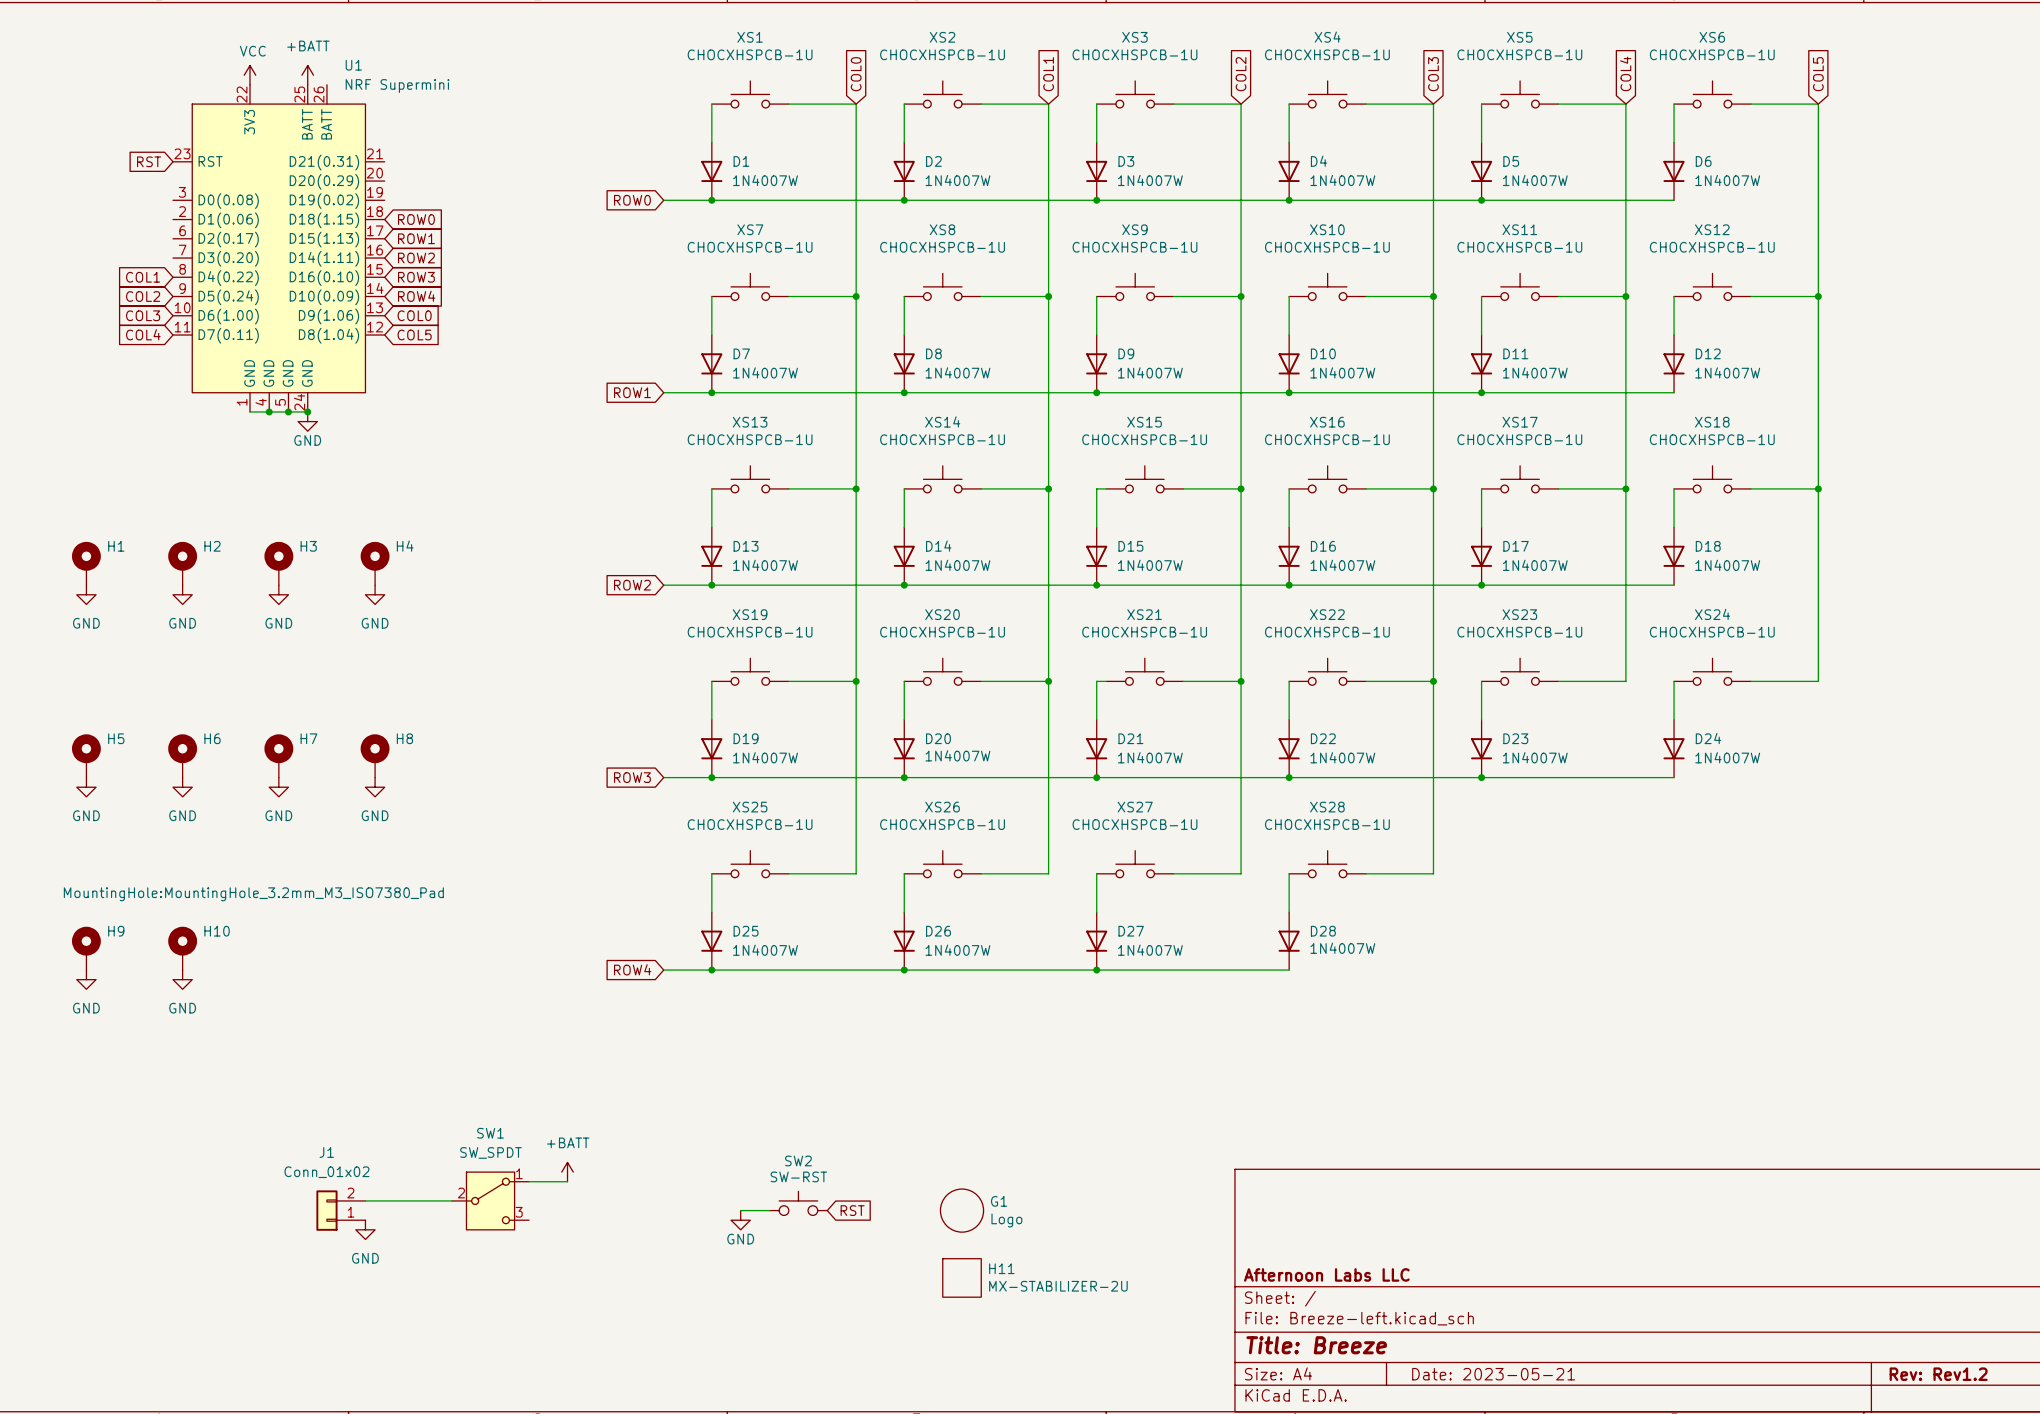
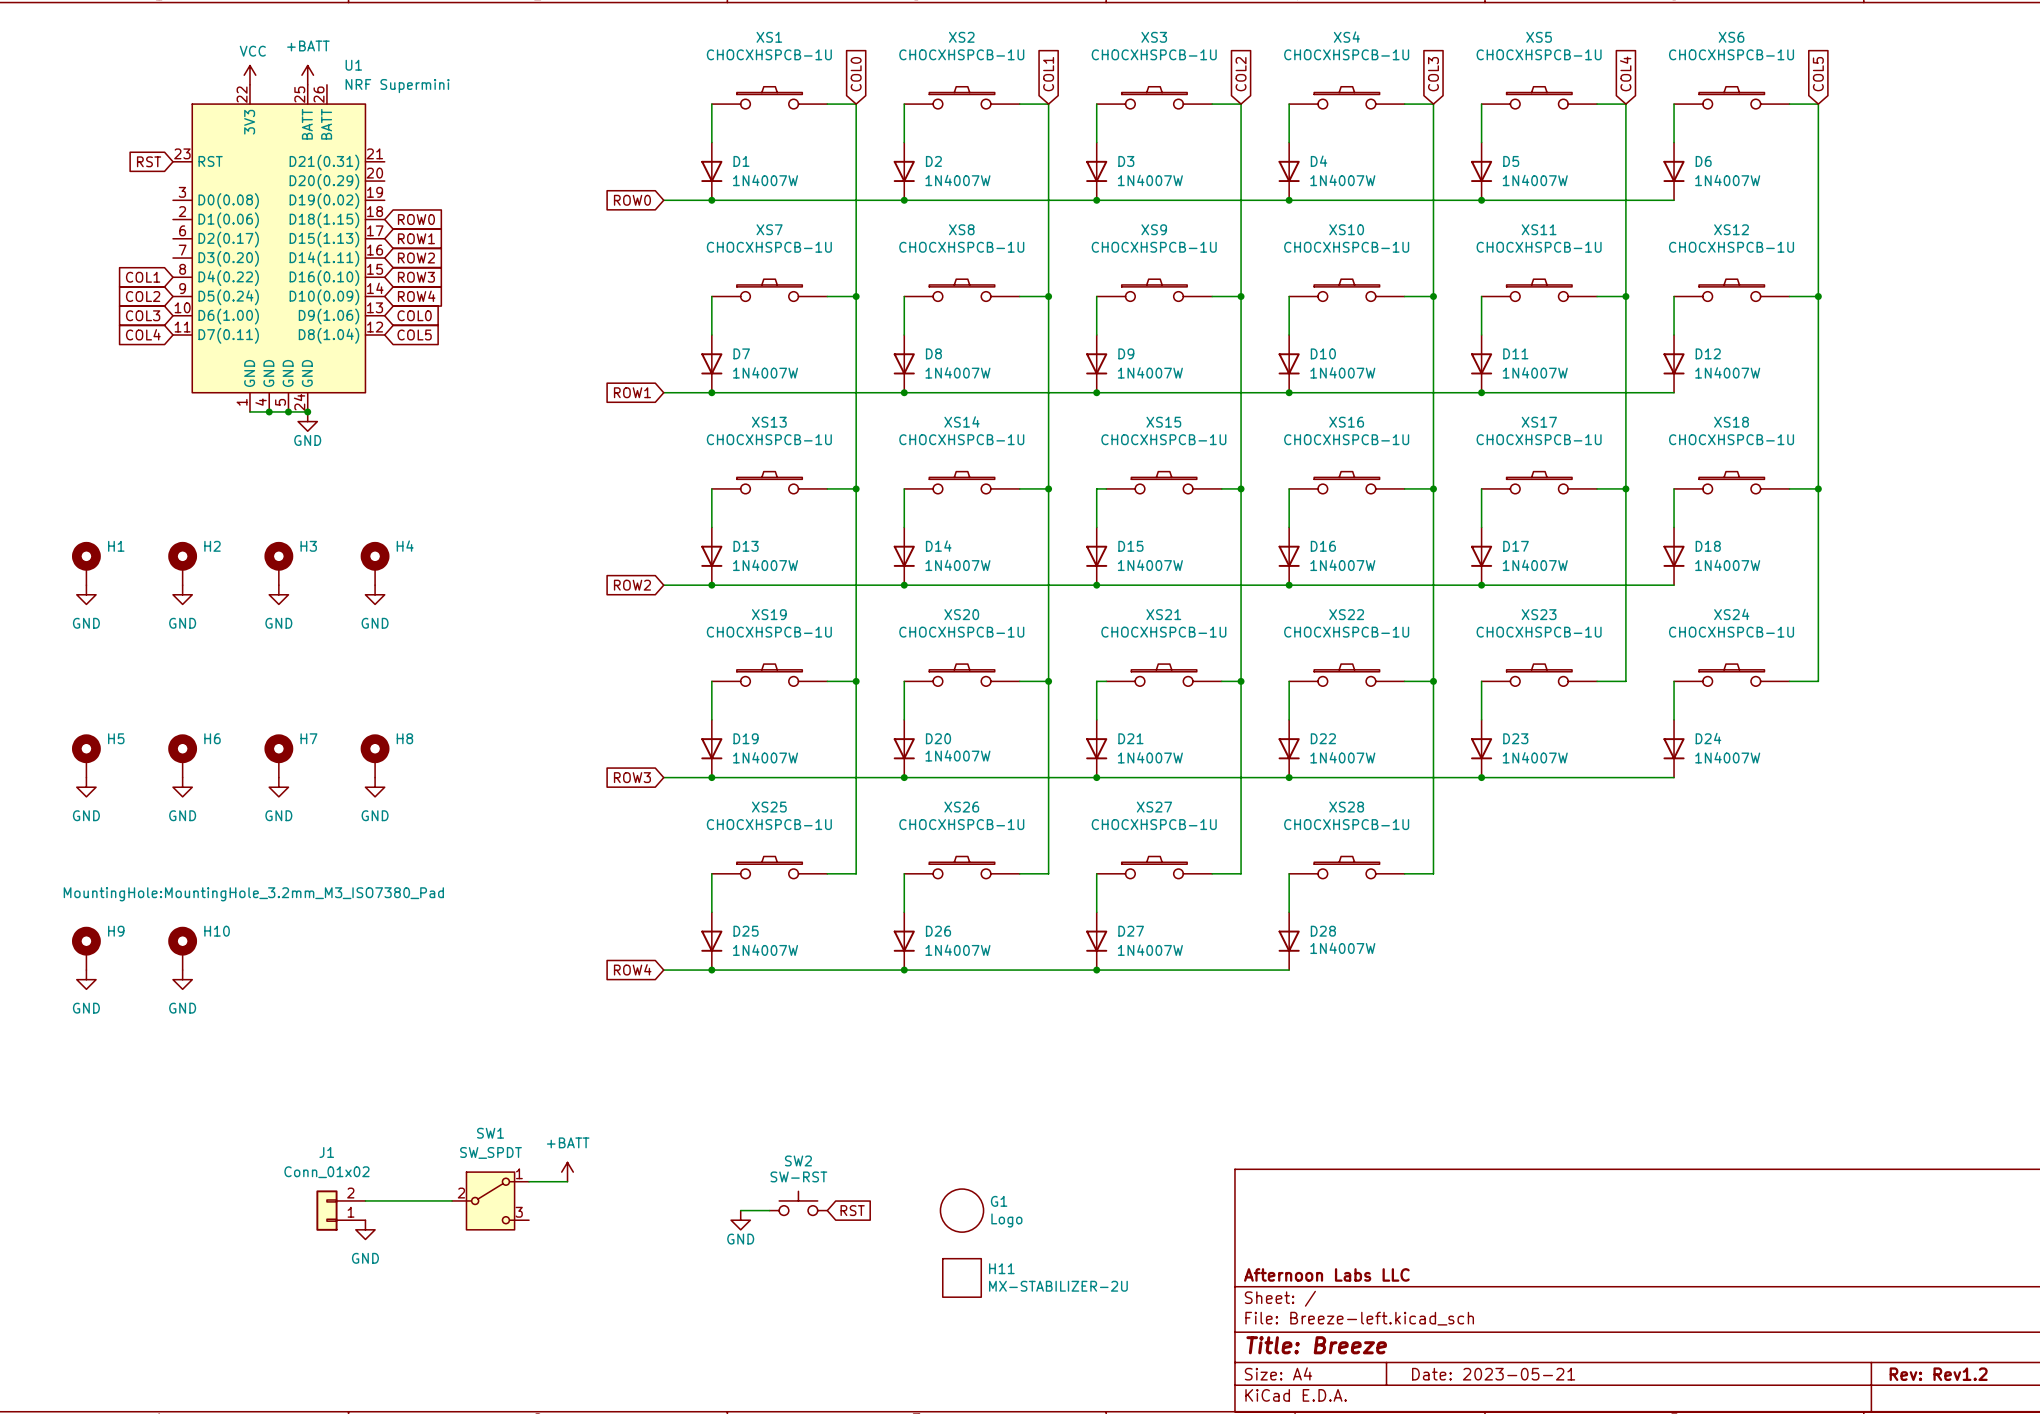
XS1 symbol: [711, 80, 789, 108] -> [711, 86, 828, 109]
XS2 symbol: [904, 80, 982, 108] -> [904, 86, 1020, 109]
XS3 symbol: [1096, 80, 1174, 108] -> [1096, 86, 1213, 109]
XS4 symbol: [1289, 80, 1367, 108] -> [1289, 86, 1405, 109]
XS5 symbol: [1481, 80, 1559, 108] -> [1481, 86, 1598, 109]
XS6 symbol: [1674, 80, 1752, 108] -> [1674, 86, 1790, 109]
XS7 symbol: [711, 273, 789, 301] -> [711, 279, 828, 302]
XS8 symbol: [904, 273, 982, 301] -> [904, 279, 1020, 302]
XS9 symbol: [1096, 273, 1174, 301] -> [1096, 279, 1213, 302]
XS10 symbol: [1289, 273, 1367, 301] -> [1289, 279, 1405, 302]
XS11 symbol: [1481, 273, 1559, 301] -> [1481, 279, 1598, 302]
XS12 symbol: [1674, 273, 1752, 301] -> [1674, 279, 1790, 302]
XS13 symbol: [711, 465, 789, 493] -> [711, 471, 828, 494]
XS14 symbol: [904, 465, 982, 493] -> [904, 471, 1020, 494]
XS15 symbol: [1106, 465, 1184, 493] -> [1106, 471, 1222, 494]
XS16 symbol: [1289, 465, 1367, 493] -> [1289, 471, 1405, 494]
XS17 symbol: [1481, 465, 1559, 493] -> [1481, 471, 1598, 494]
XS18 symbol: [1674, 465, 1752, 493] -> [1674, 471, 1790, 494]
XS19 symbol: [711, 658, 789, 686] -> [711, 664, 828, 687]
XS20 symbol: [904, 658, 982, 686] -> [904, 664, 1020, 687]
XS21 symbol: [1106, 658, 1184, 686] -> [1106, 664, 1222, 687]
XS22 symbol: [1289, 658, 1367, 686] -> [1289, 664, 1405, 687]
XS23 symbol: [1481, 658, 1559, 686] -> [1481, 664, 1598, 687]
XS24 symbol: [1674, 658, 1752, 686] -> [1674, 664, 1790, 687]
XS25 symbol: [711, 850, 789, 878] -> [711, 856, 828, 879]
XS26 symbol: [904, 850, 982, 878] -> [904, 856, 1020, 879]
XS27 symbol: [1096, 850, 1174, 878] -> [1096, 856, 1213, 879]
XS28 symbol: [1289, 850, 1367, 878] -> [1289, 856, 1405, 879]

